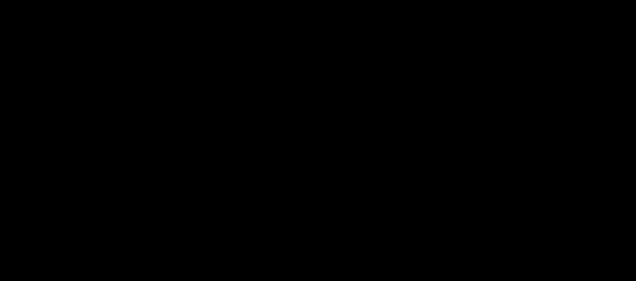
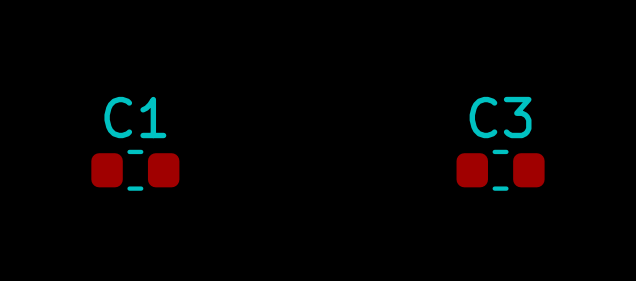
C1: none -> (135, 170)
C3: none -> (500, 170)

